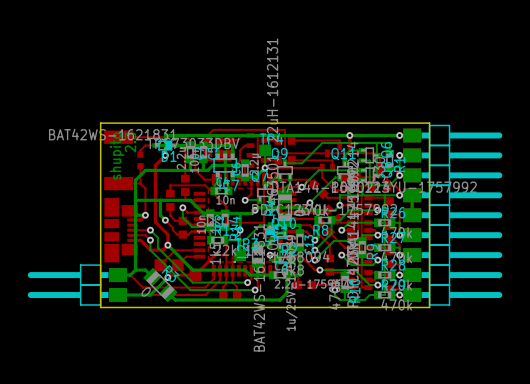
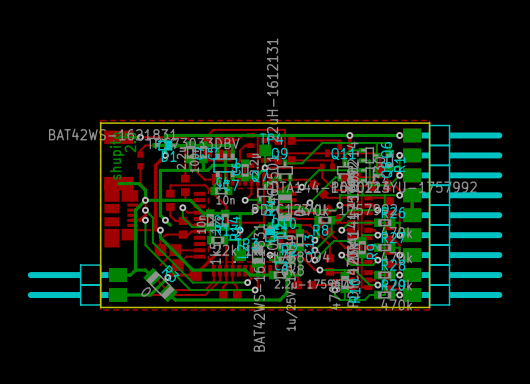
top zone outline: none -> (429, 120) (100, 120) (100, 309) (429, 309) (429, 120)
bottom track: none -> (140, 137) (118, 137)
via: none -> (140, 137)
bottom track: (160, 170) (145, 170) (135, 180) (135, 210) -> (160, 170) (160, 200)
bottom track: none -> (118, 183) (138, 183) (145, 190) (145, 200) (135, 210)
bottom track: (145, 200) (135, 200) -> none
via: none -> (145, 200)
via: none -> (145, 210)
bottom track: (145, 215) (135, 215) -> none
via: (145, 215) -> none
via: none -> (145, 220)
top track: (165, 220) (177, 234) -> (160, 250) (160, 240) (165, 234) (177, 234)
bottom track: none -> (165, 220) (170, 225)
top track: (155, 222) (167, 234) (167, 245) (162, 250) (150, 250) (140, 240) (132, 240) -> (155, 222) (155, 230)
part position: (121, 230) -> (121, 215)
bottom track: (150, 230) (157, 237) (157, 247) -> (145, 210) (152, 217) (152, 242) (157, 247)
via: (150, 230) -> none
bottom track: none -> (160, 230) (160, 237) (167, 245)
via: none -> (160, 230)
top track: (132, 235) (145, 235) (150, 240) -> none
bottom track: (150, 240) (150, 250) -> (145, 220) (145, 245) (150, 250)
via: (150, 240) -> none
via: (167, 245) -> none
part: none -> (160, 250)
part: none -> (175, 250)
part: (160, 265) -> none
top track: (130, 275) (142, 287) (205, 287) (213, 279) -> (152, 275) (167, 290) (205, 290) (213, 281) (213, 279)

